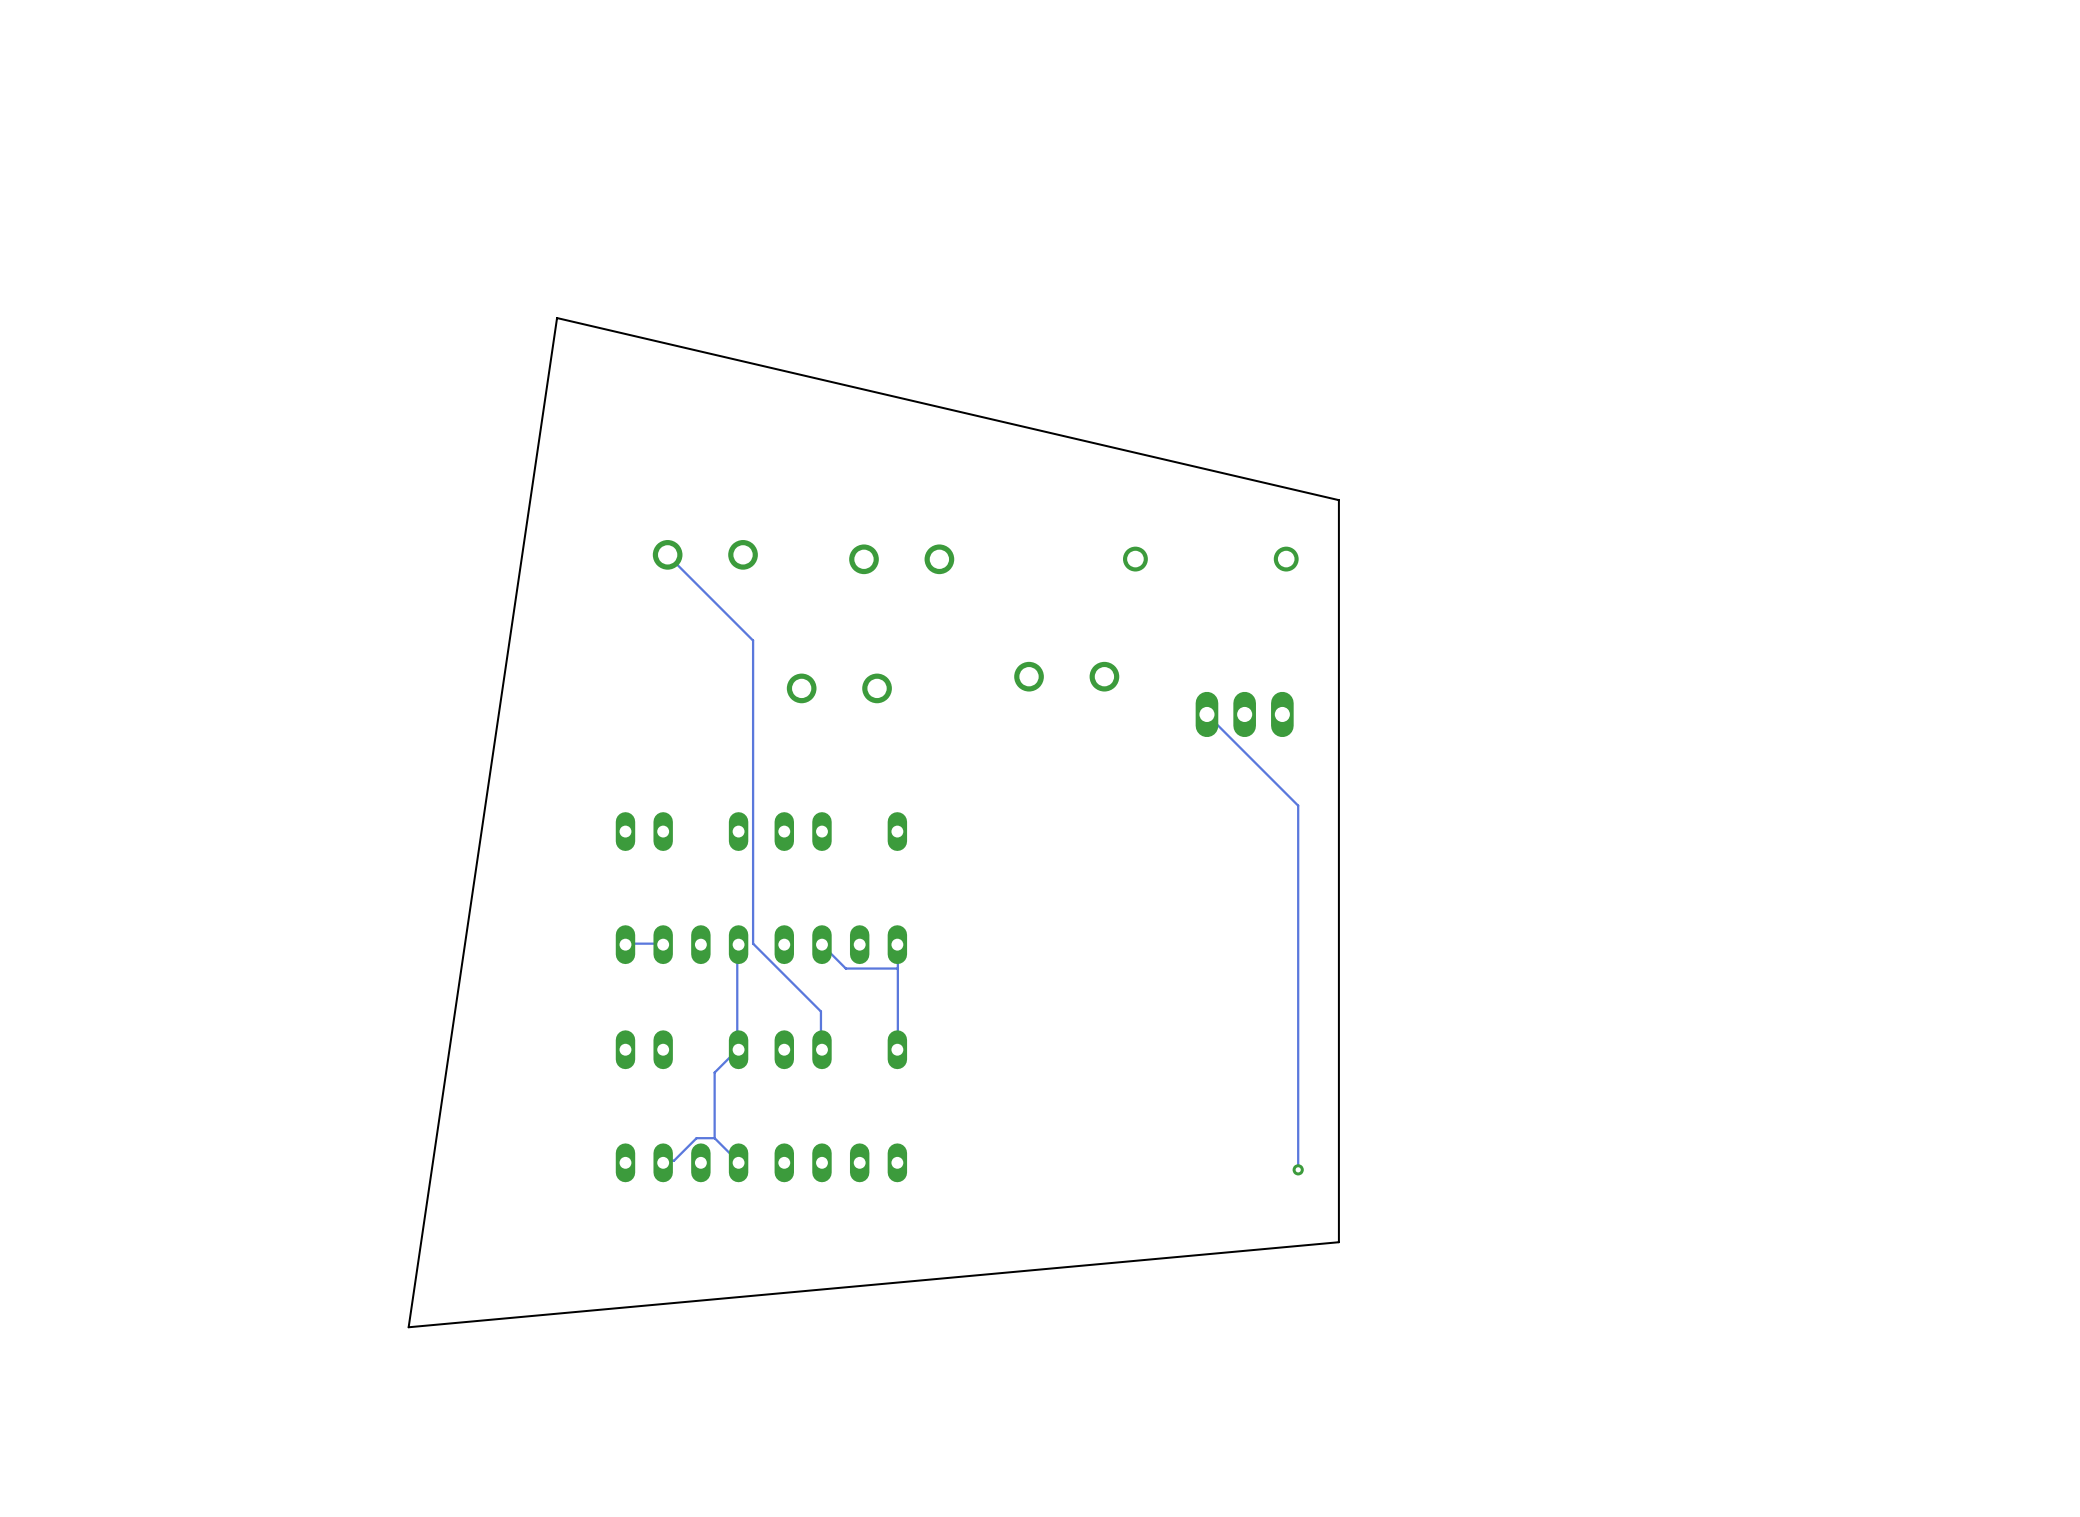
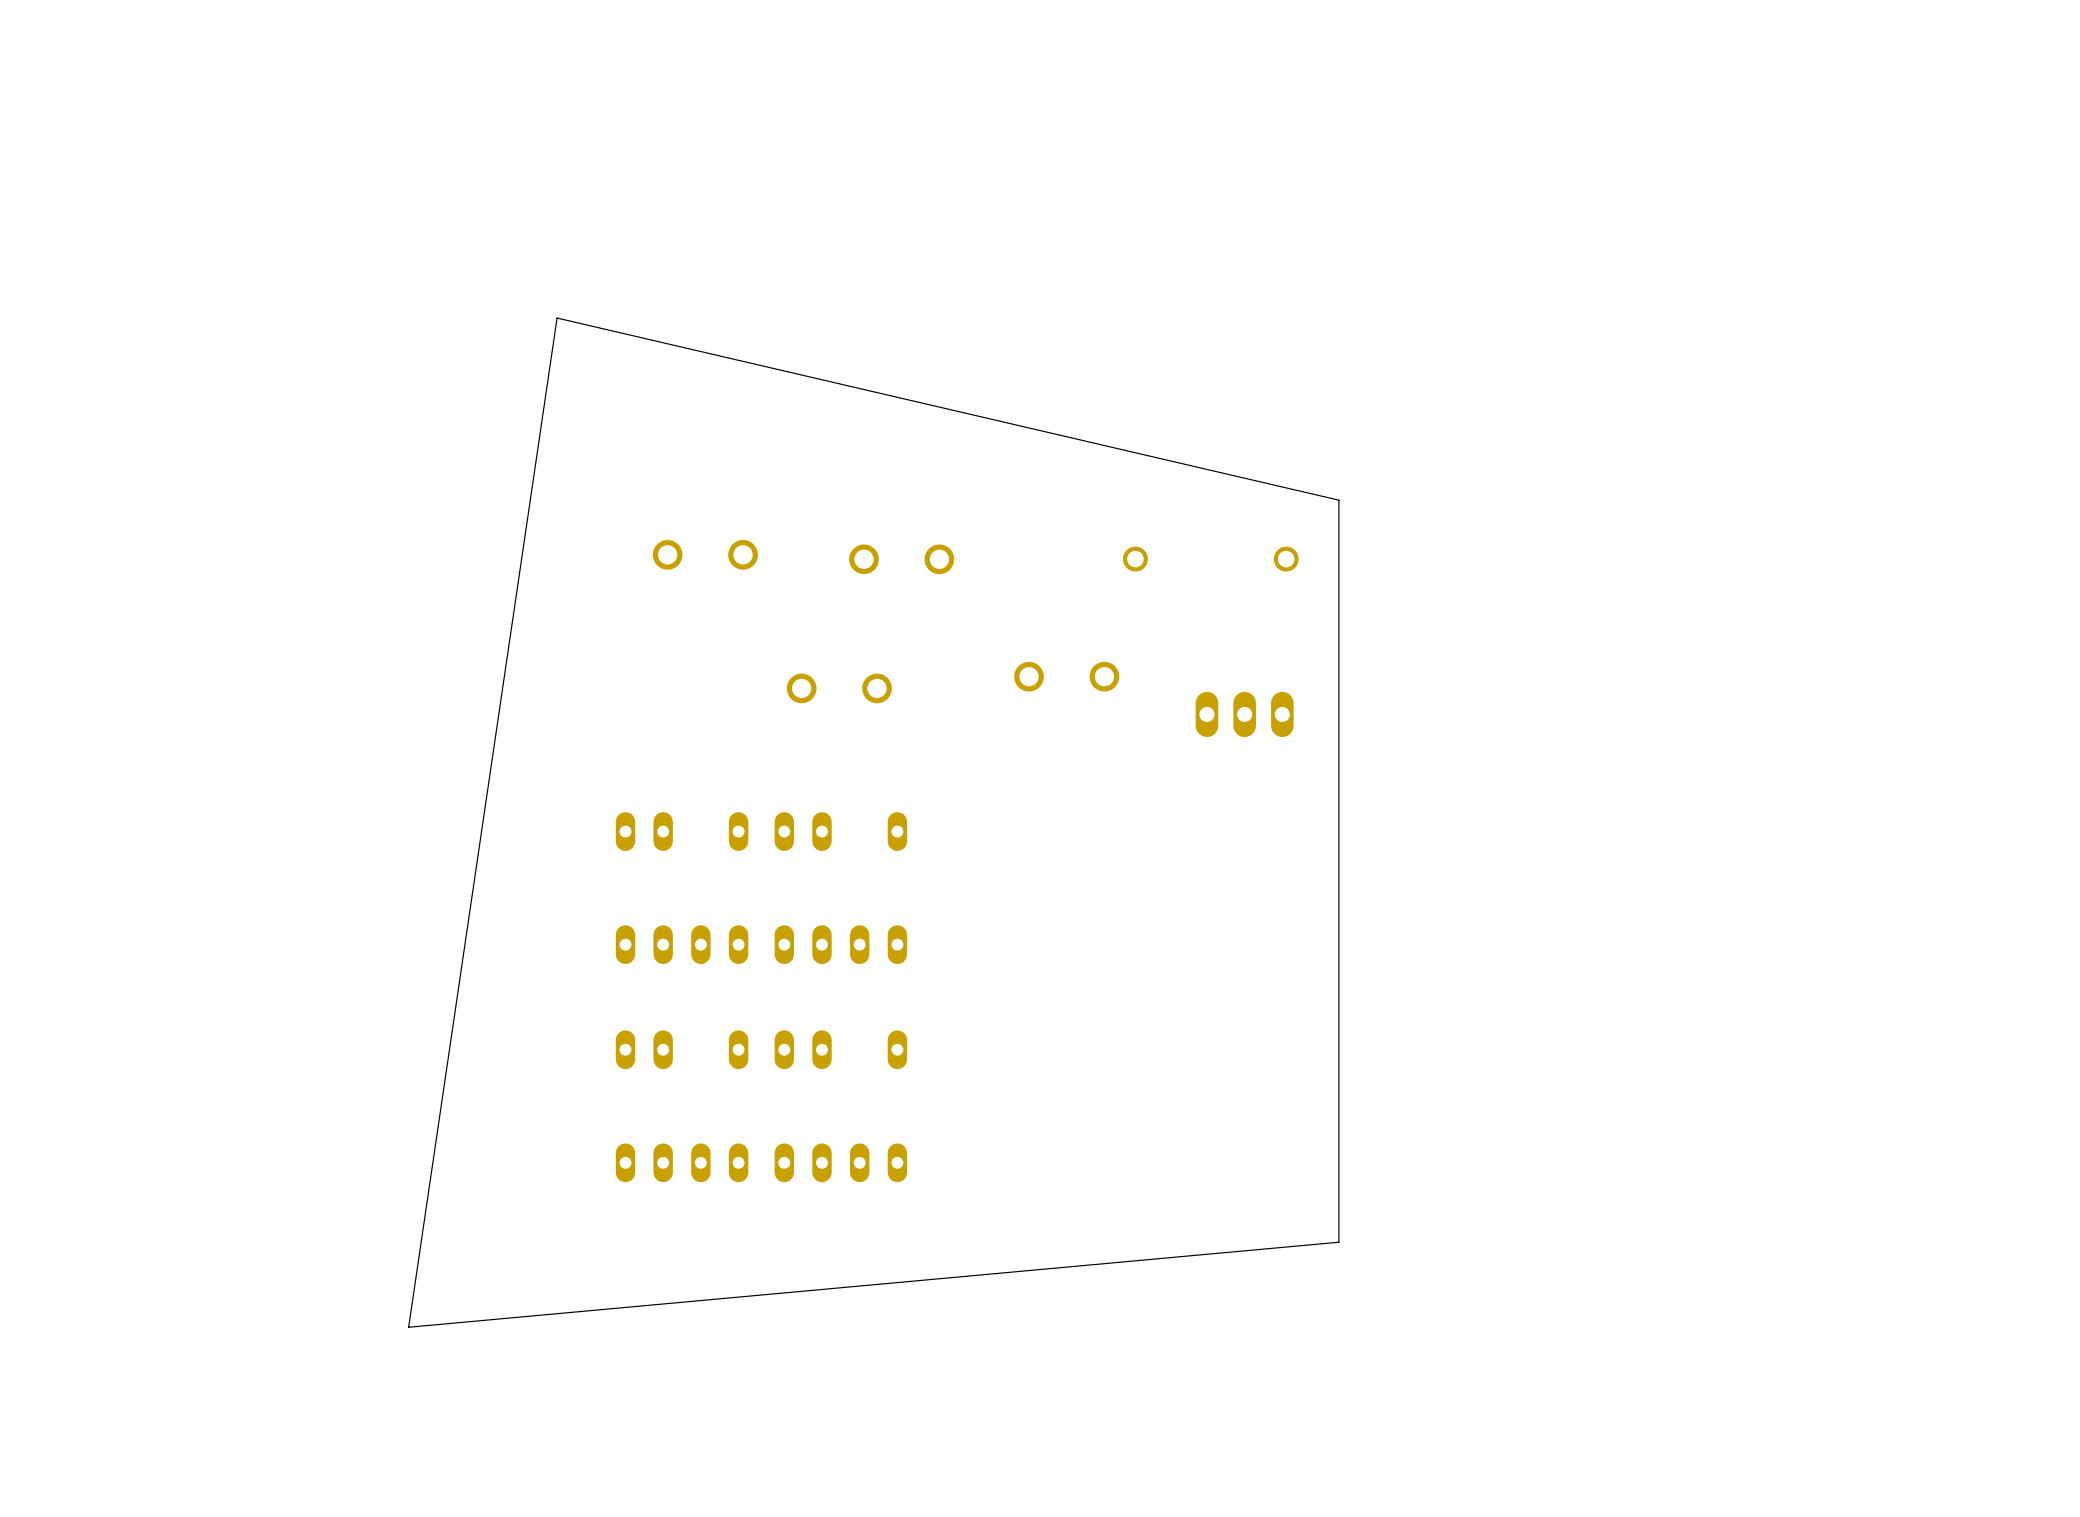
track: (667, 554) (753, 640) (753, 943) (820, 1011) (821, 1049) -> none
track: (1206, 714) (1298, 805) (1298, 1169) -> none
track: (663, 944) (625, 944) -> none
track: (738, 944) (738, 1049) (714, 1072) (714, 1138) -> none
track: (821, 944) (845, 968) (897, 968) -> none
track: (897, 944) (897, 1049) -> none
track: (714, 1138) (696, 1138) (673, 1160) (664, 1160) (663, 1162) -> none
track: (714, 1138) (738, 1162) -> none
via: (1298, 1169) -> none

